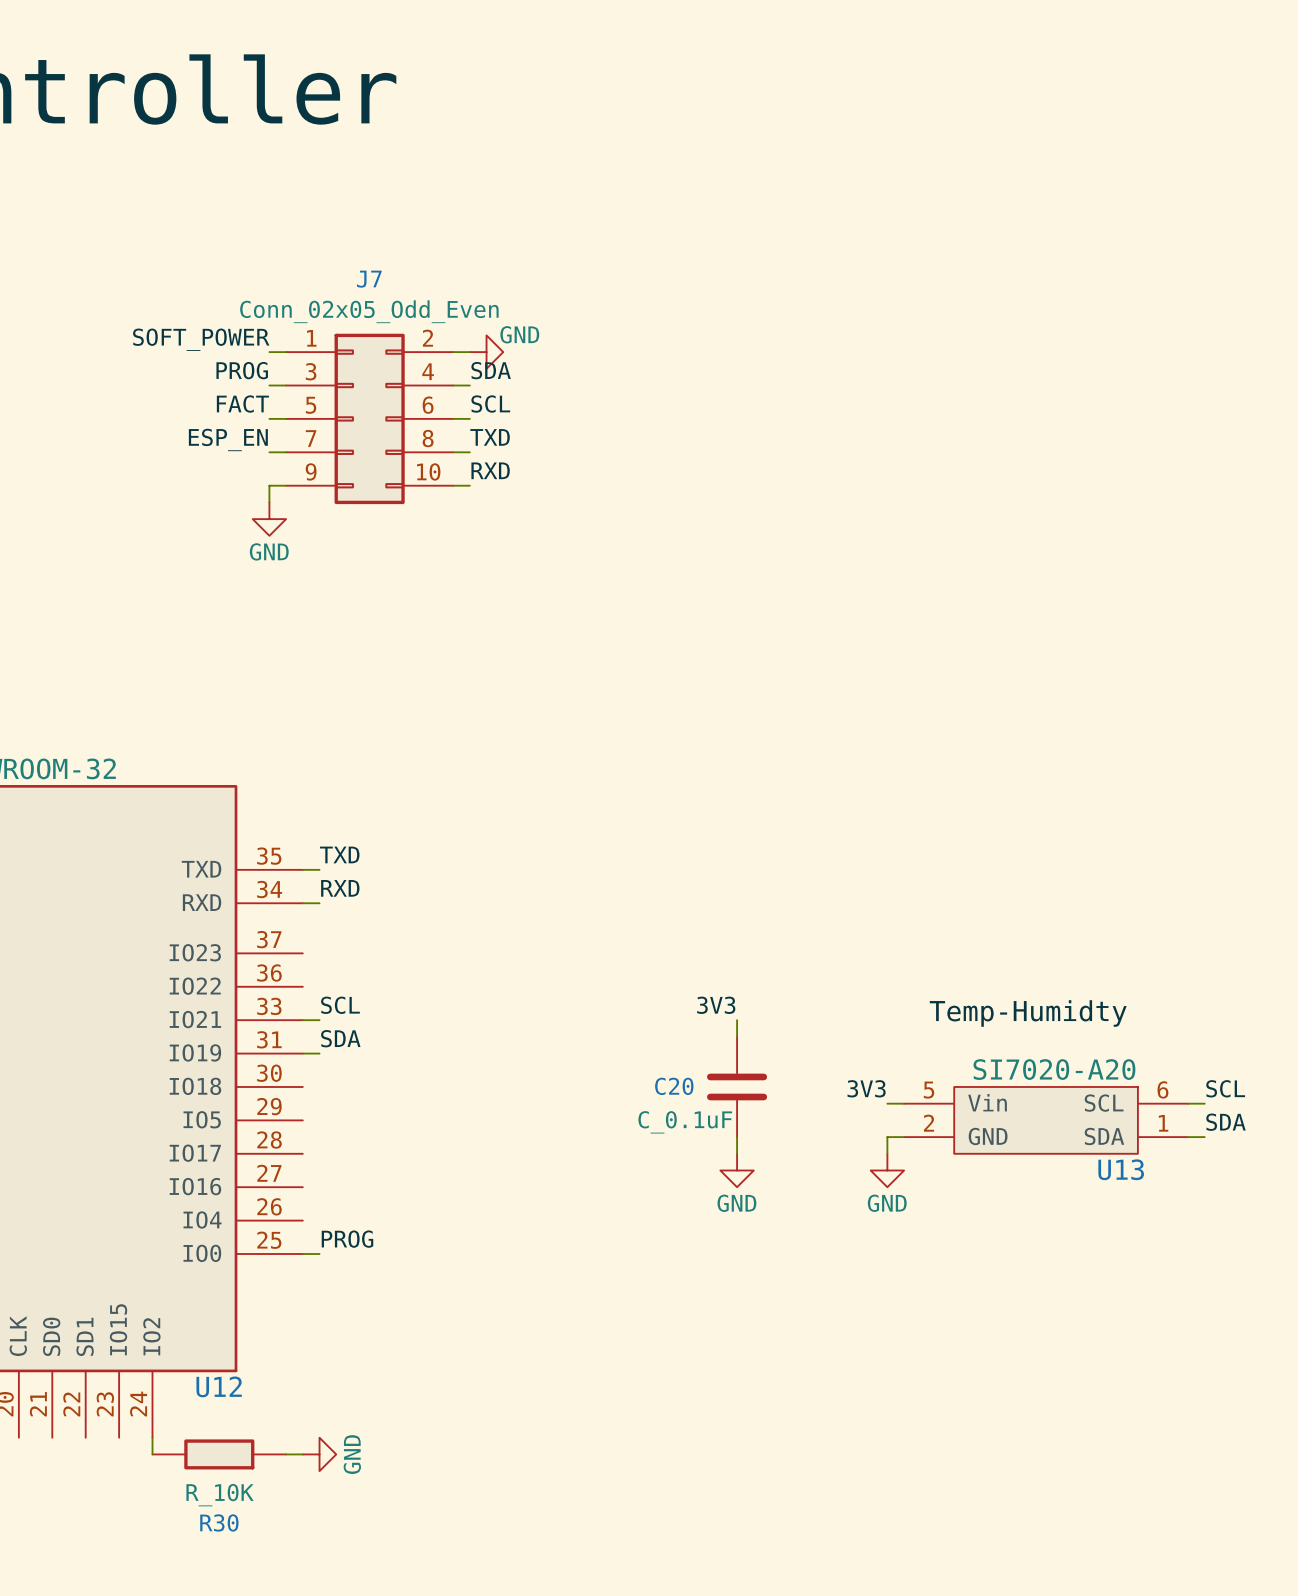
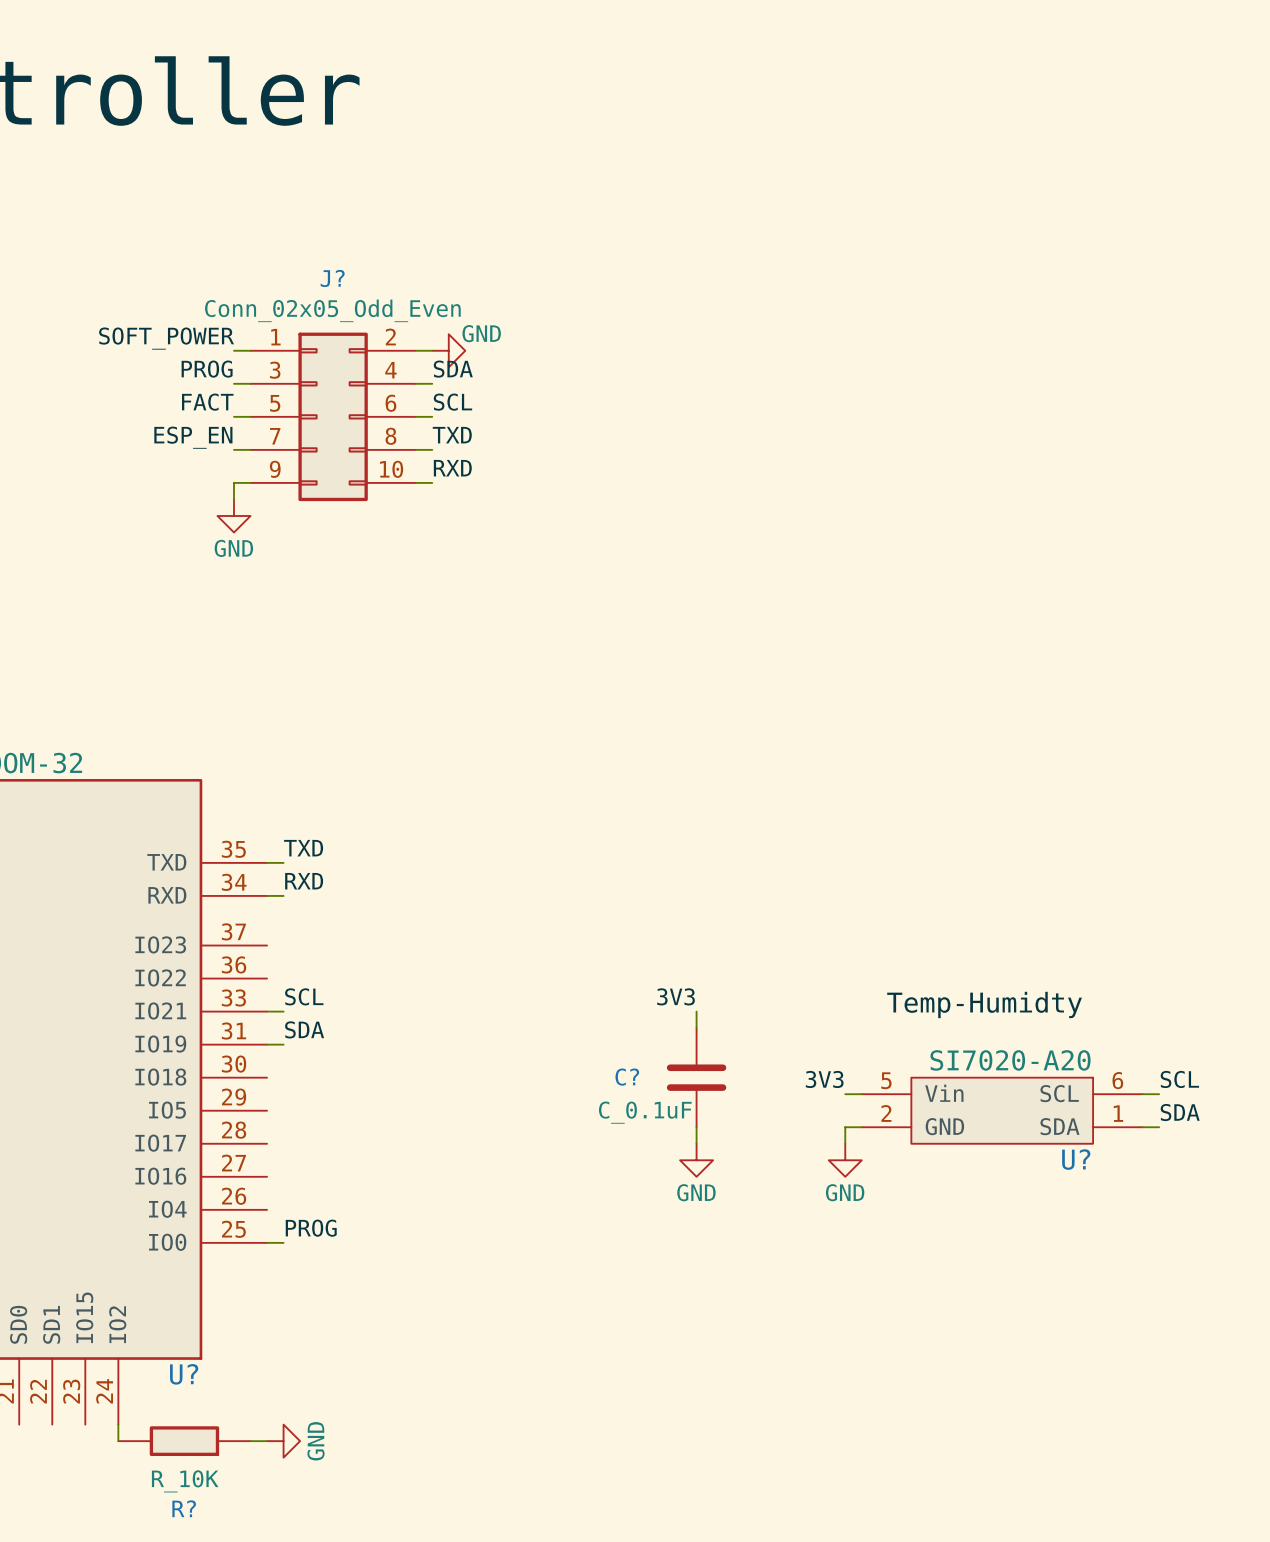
J7 name: J7 (369, 279) -> J? (332, 278)
C20 name: C20 (674, 1086) -> C? (627, 1077)
U13 name: U13 (1121, 1169) -> U? (1076, 1159)
U12 name: U12 (219, 1386) -> U? (184, 1374)
R30 name: R30 (219, 1522) -> R? (184, 1508)

